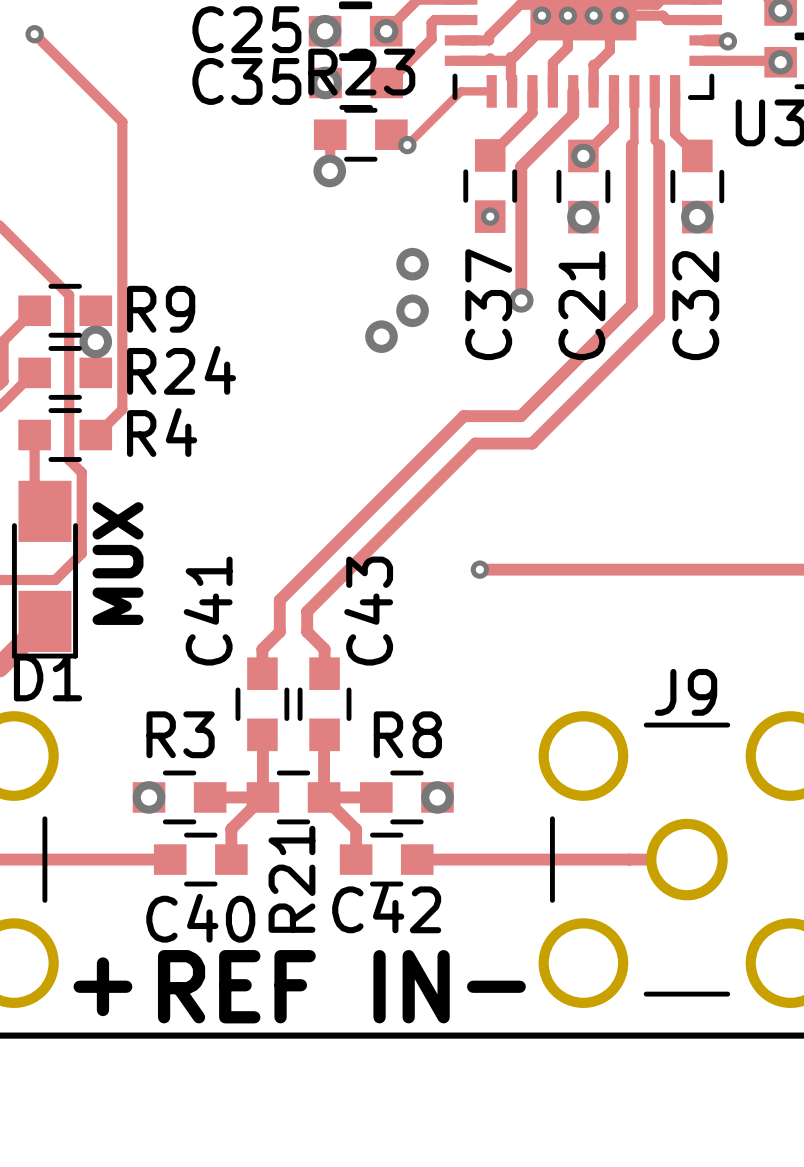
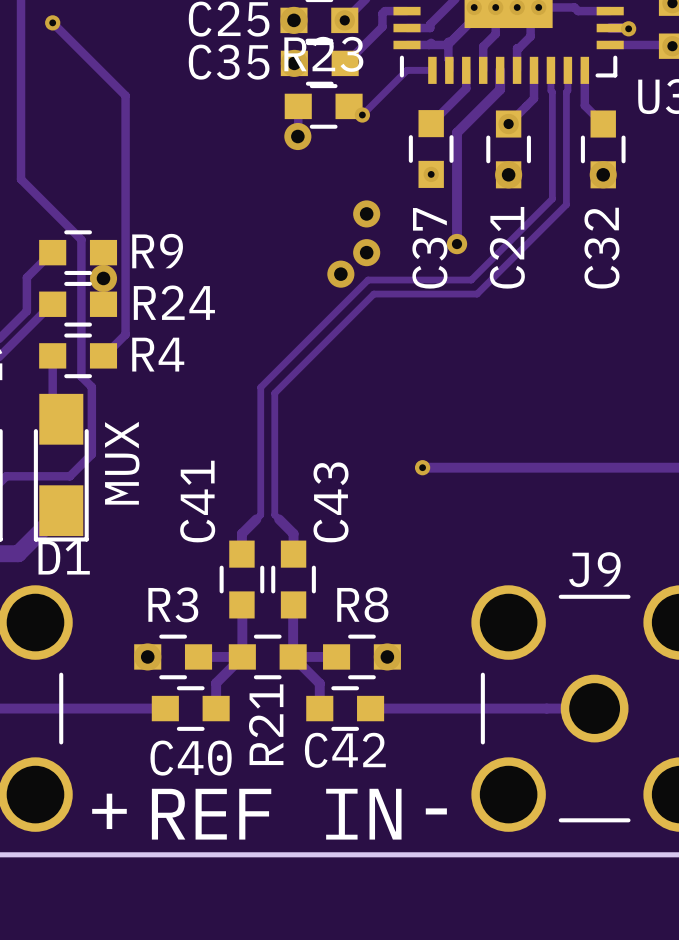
track: (634, 115) (634, 142) (631, 145) (631, 305) (520, 416) (463, 416) (279, 600) (279, 631) -> (550, 90) (552, 198) (471, 280) (368, 280) (260, 387) (260, 515) (256, 519)
track: (654, 115) (654, 140) (659, 145) (659, 316) (532, 443) (475, 443) (307, 611) (307, 631) -> (567, 90) (566, 204) (477, 294) (373, 294) (274, 393) (274, 515) (279, 519)

